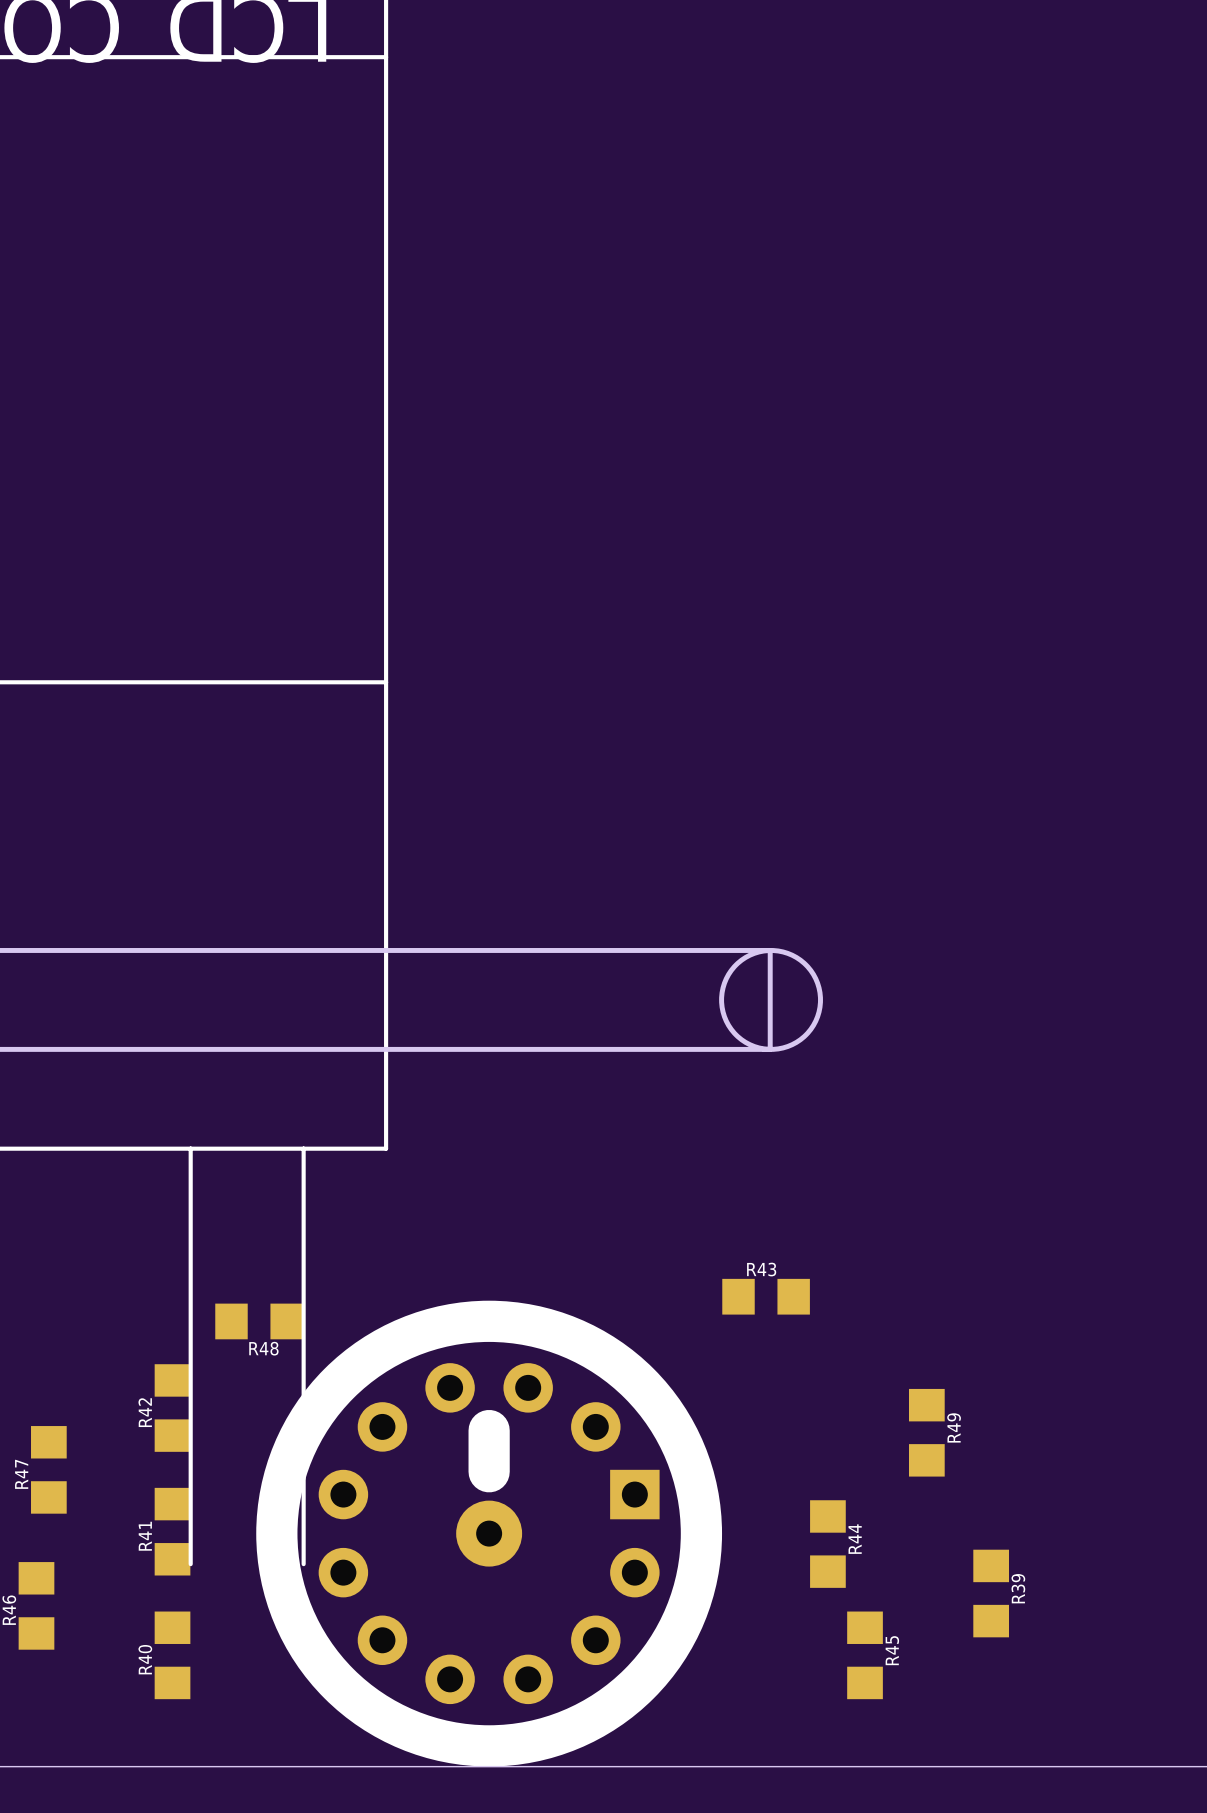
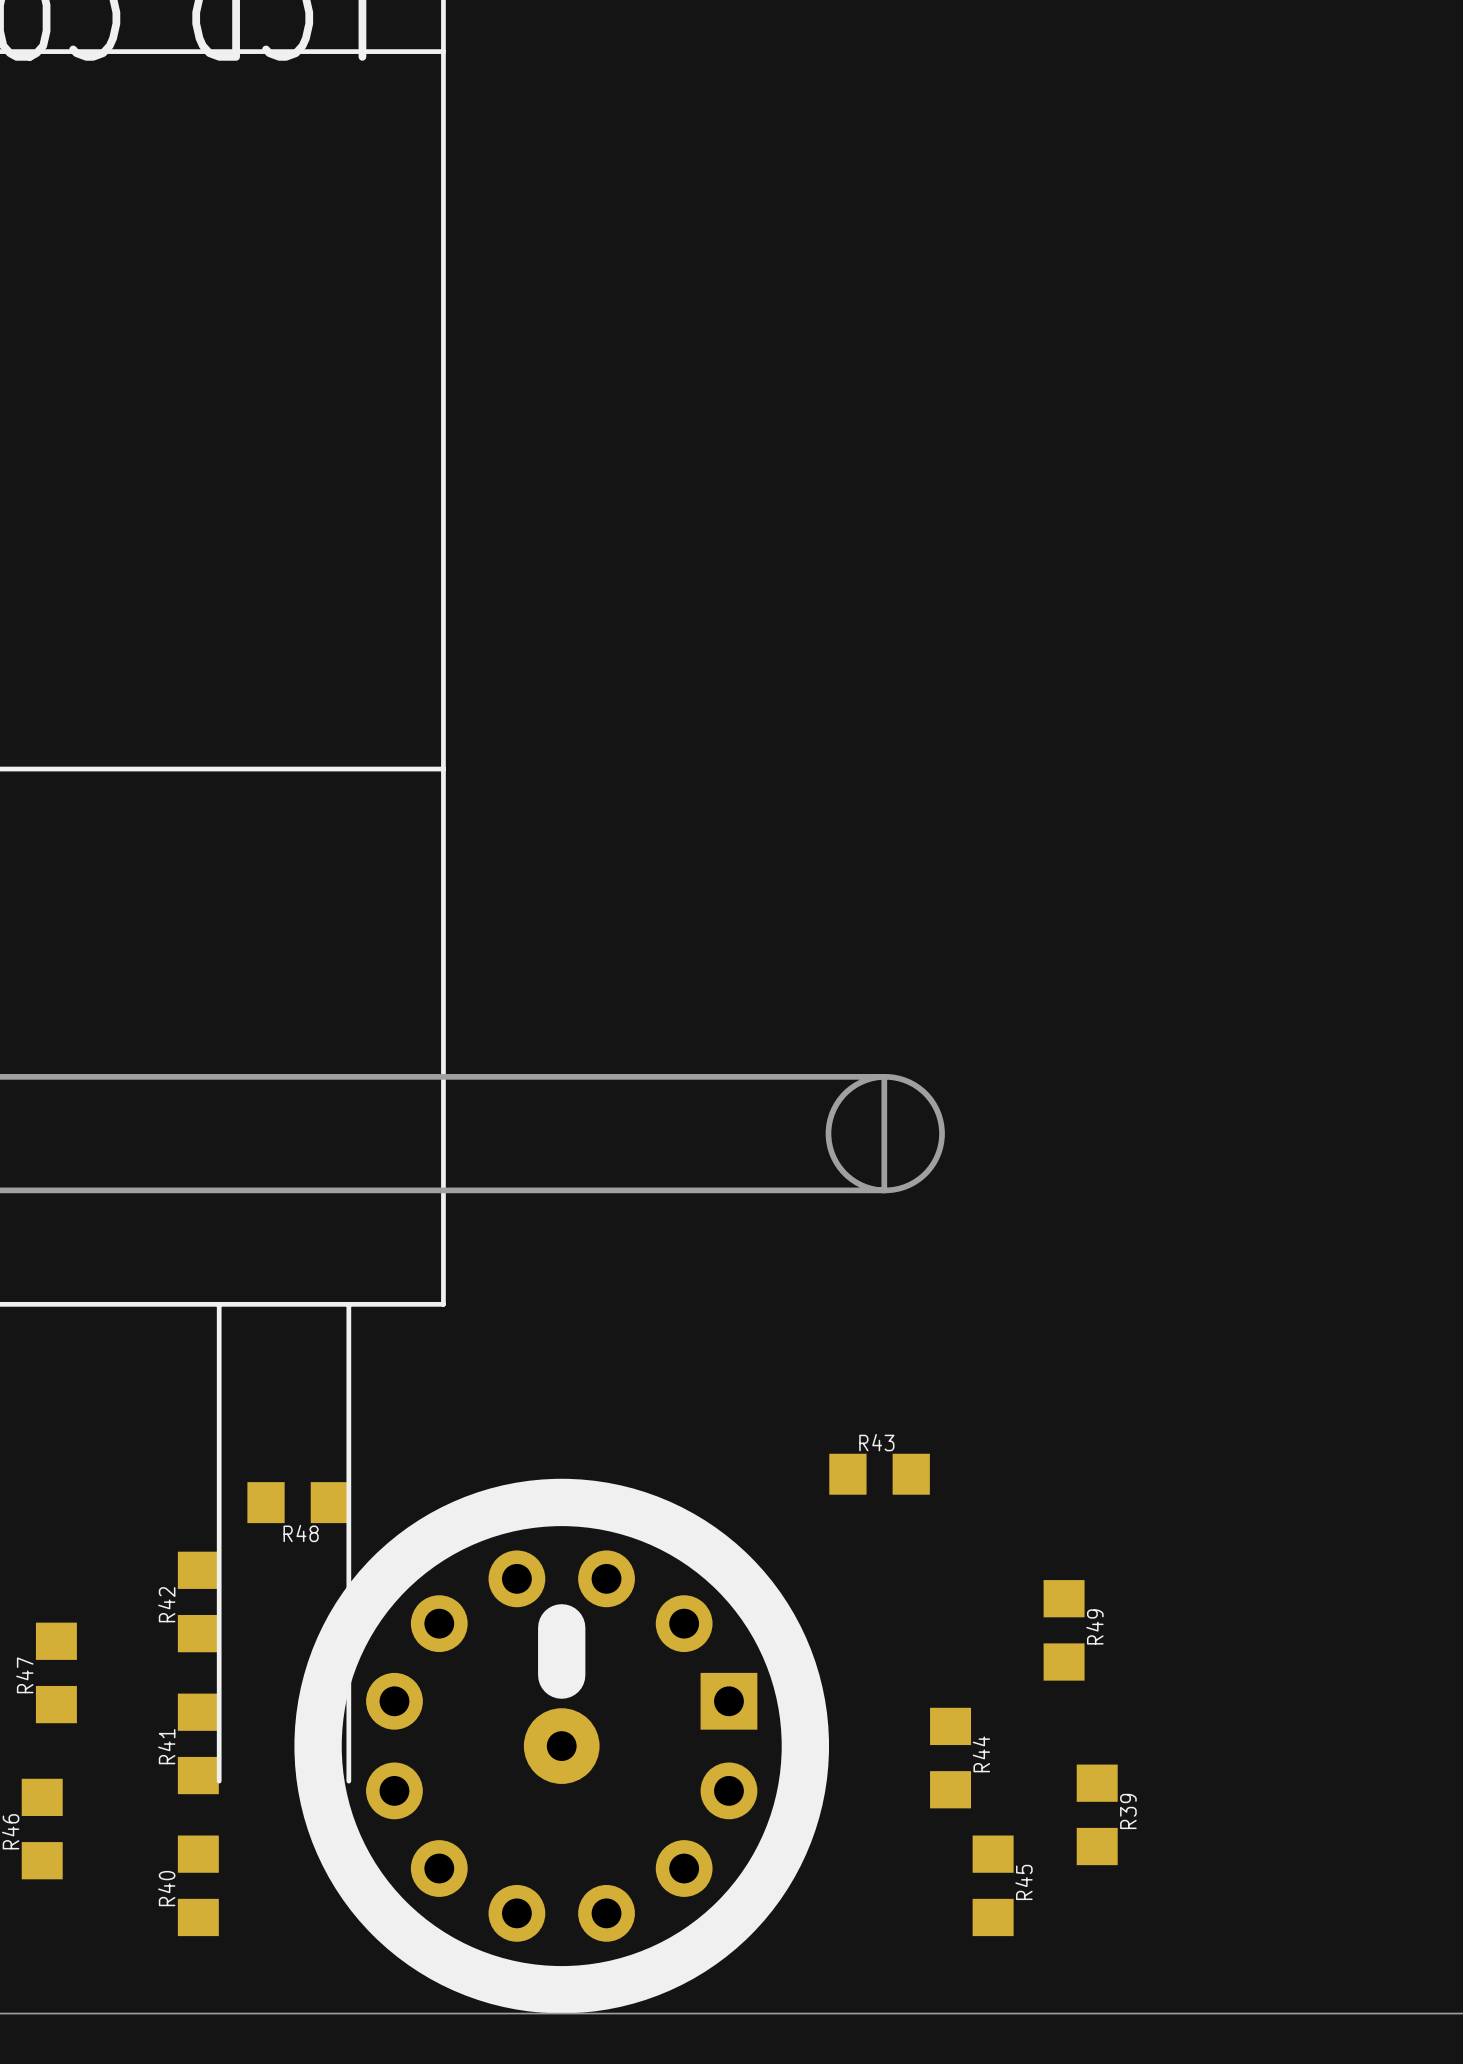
R39 position: (991, 1593) -> (1097, 1814)

